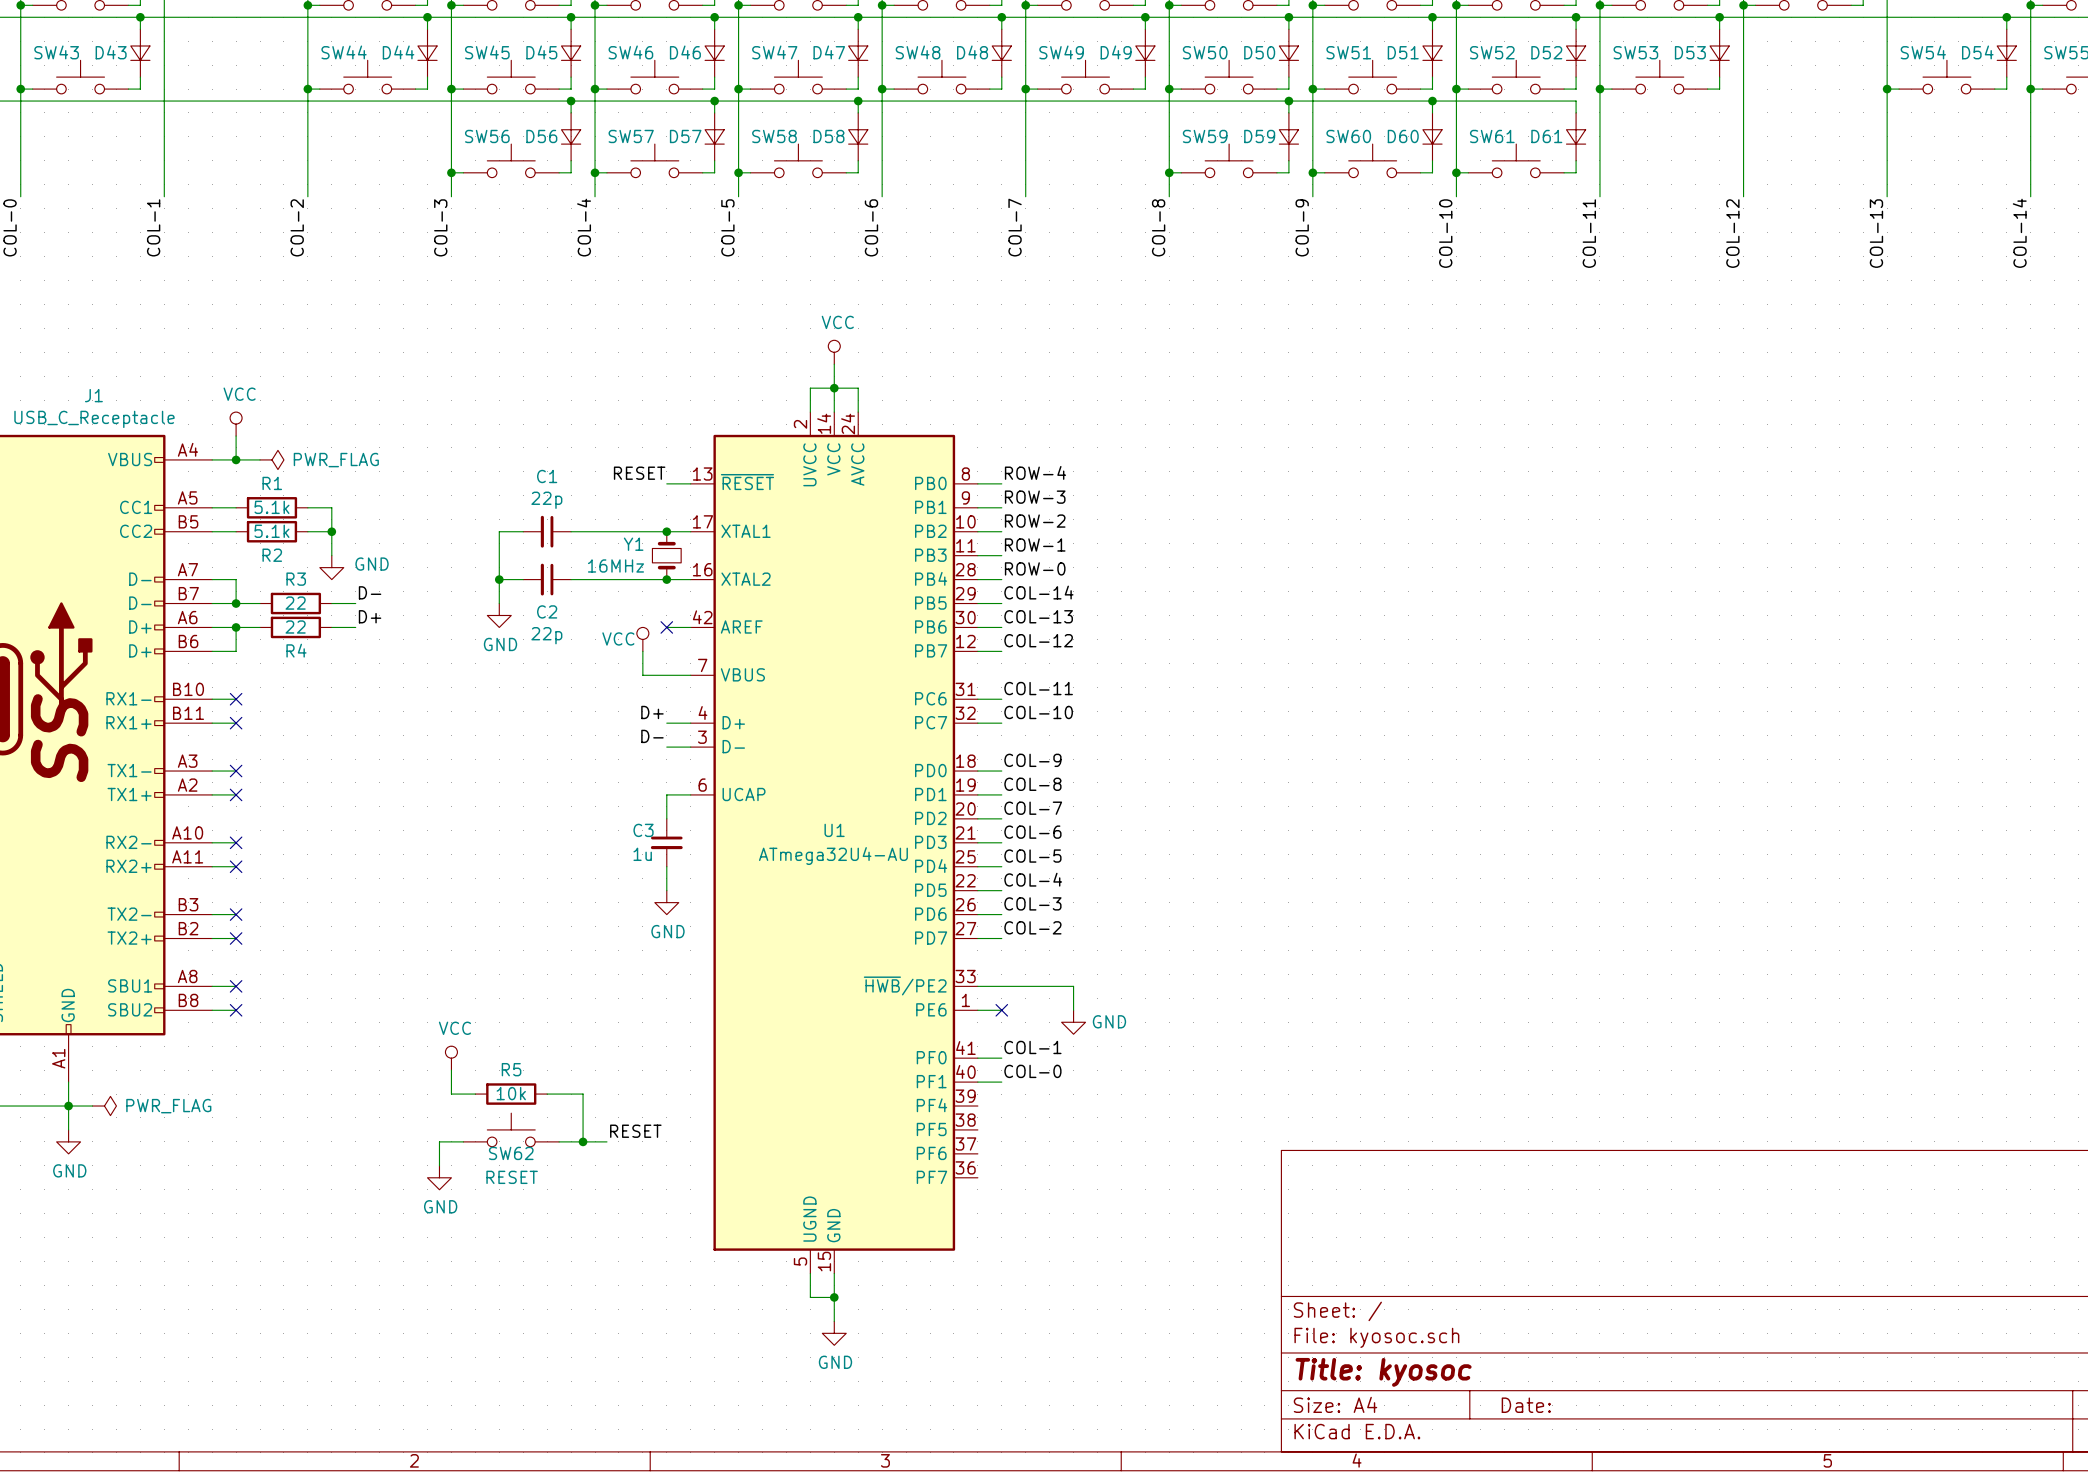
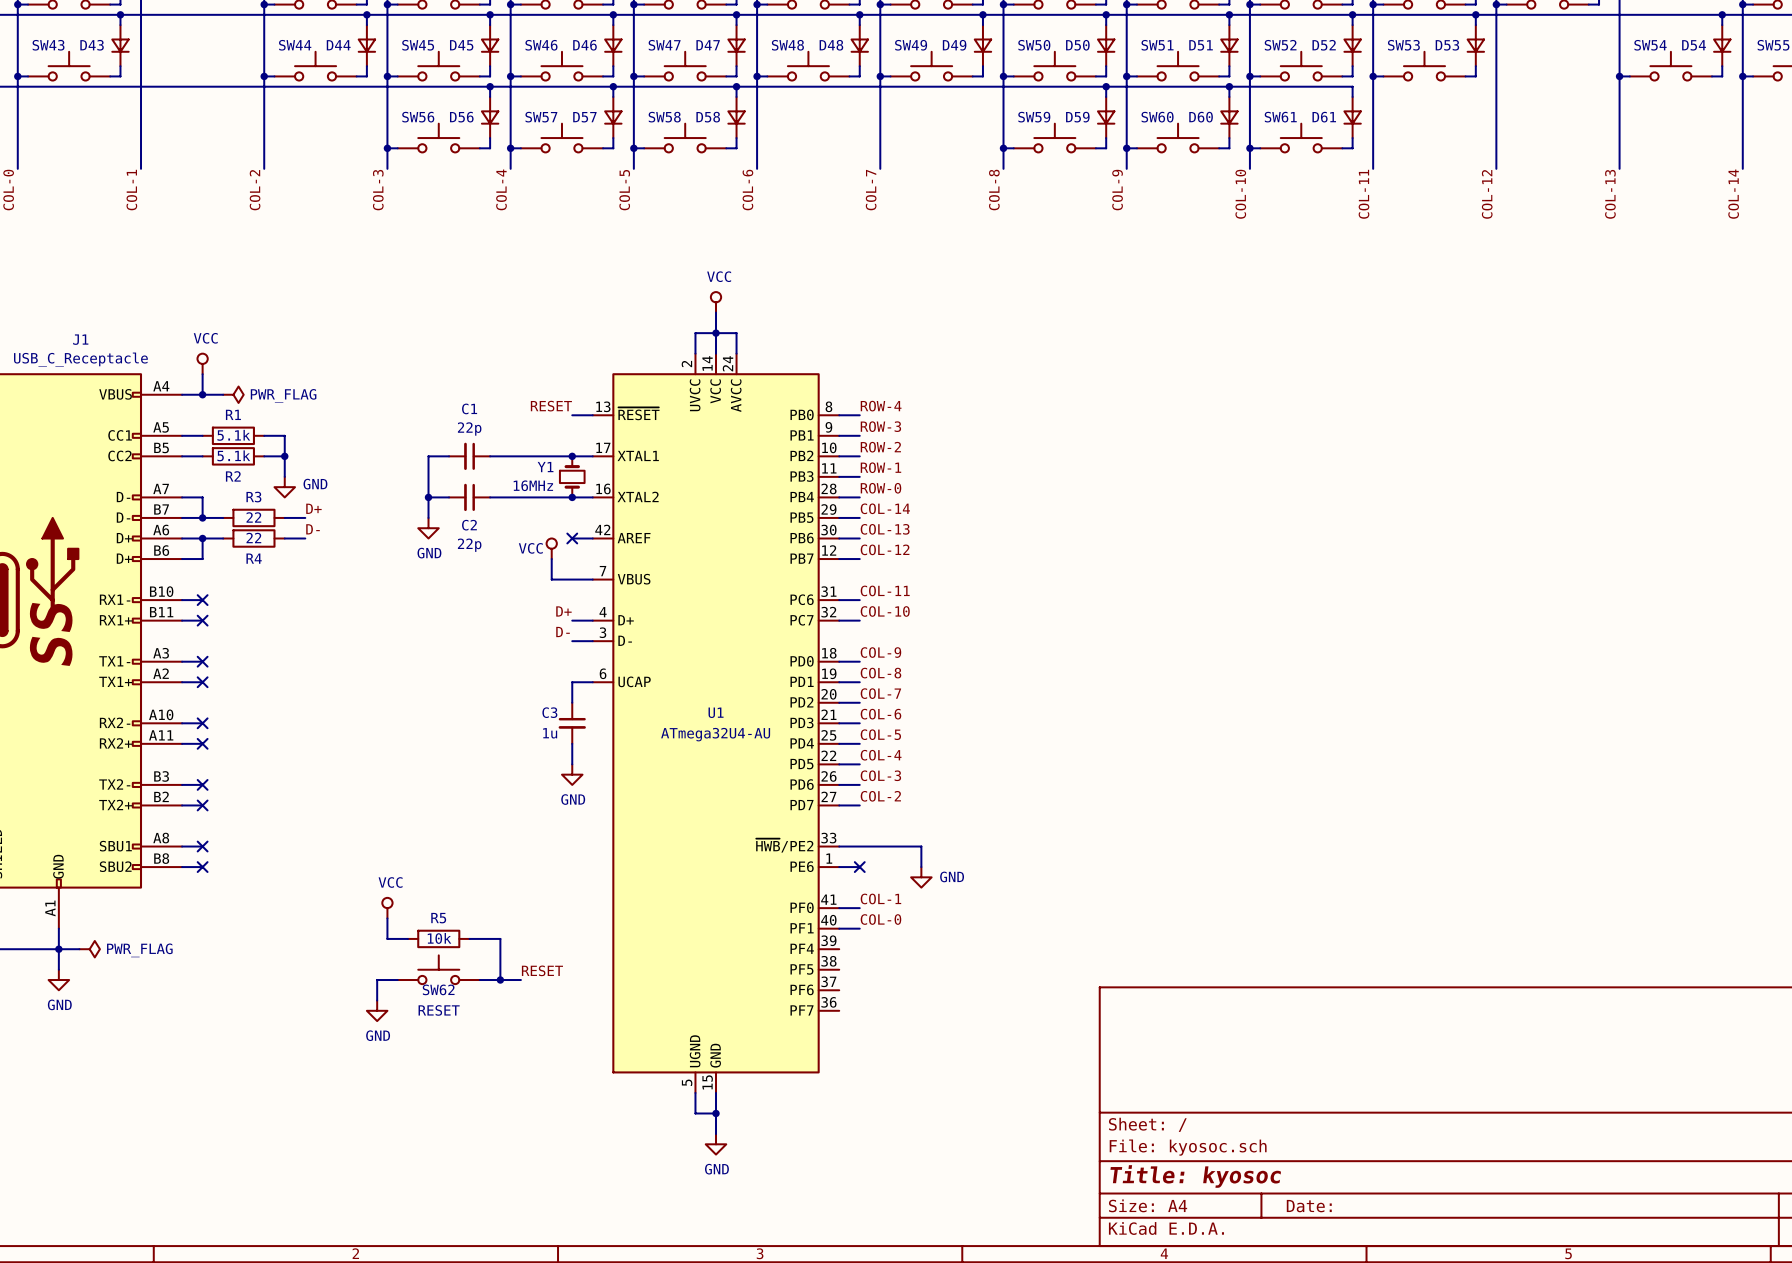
label: D- (370, 592) -> D+ (313, 508)
label: D+ (370, 616) -> D- (313, 529)

